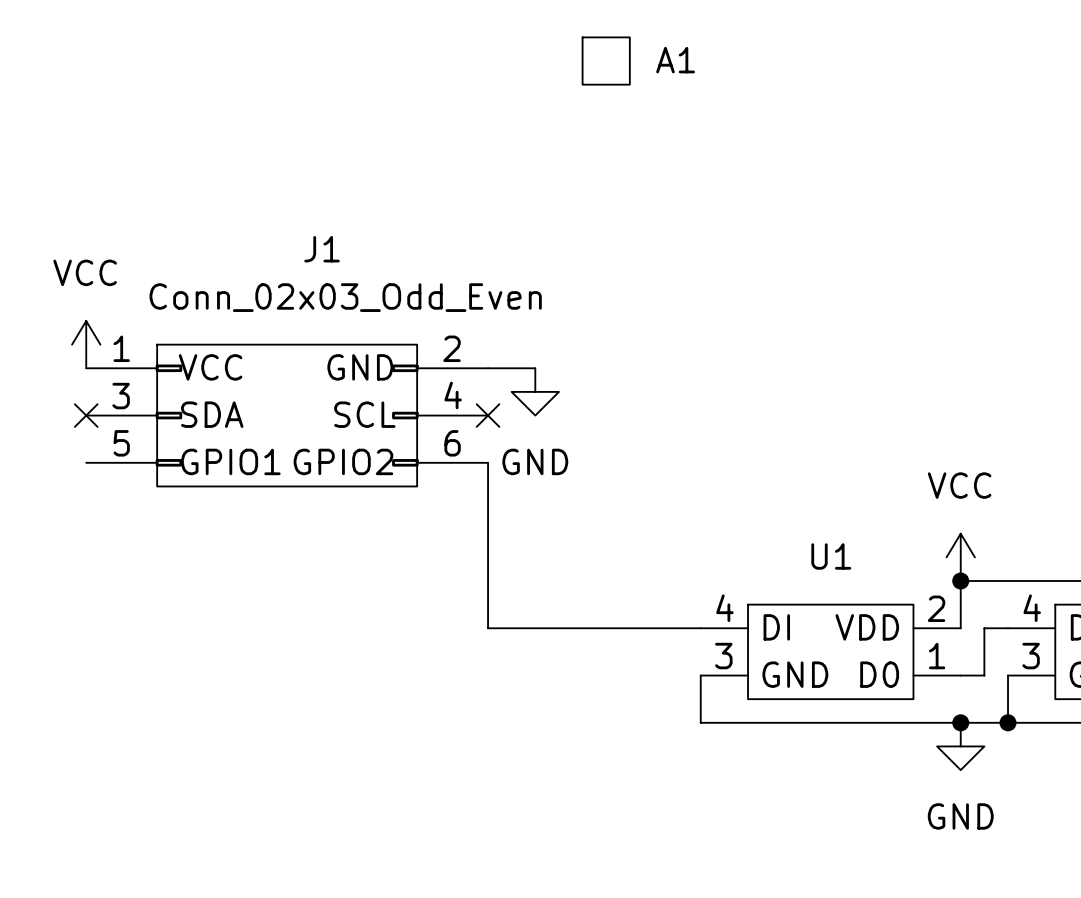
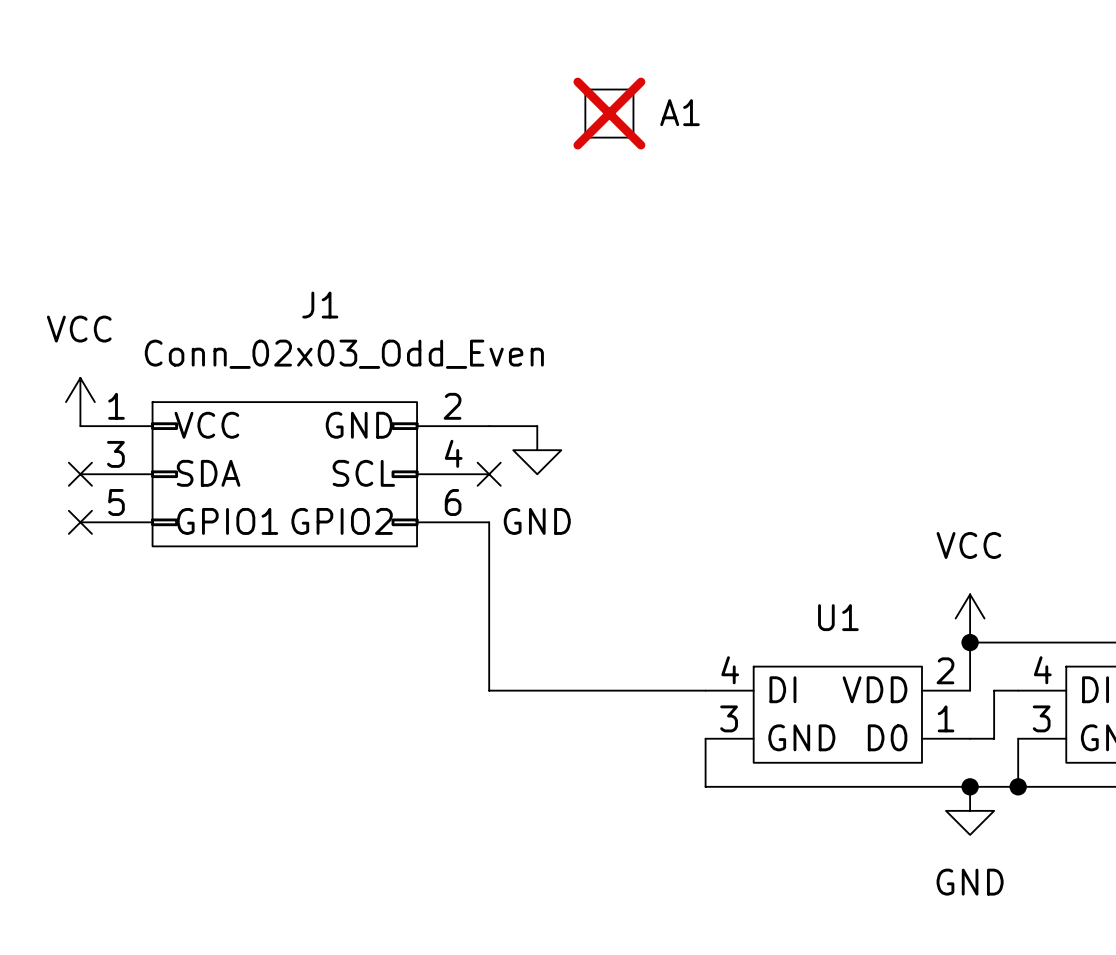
A1 do-not-place cross: none -> (609, 113)
no-connect mark: none -> (80, 522)

